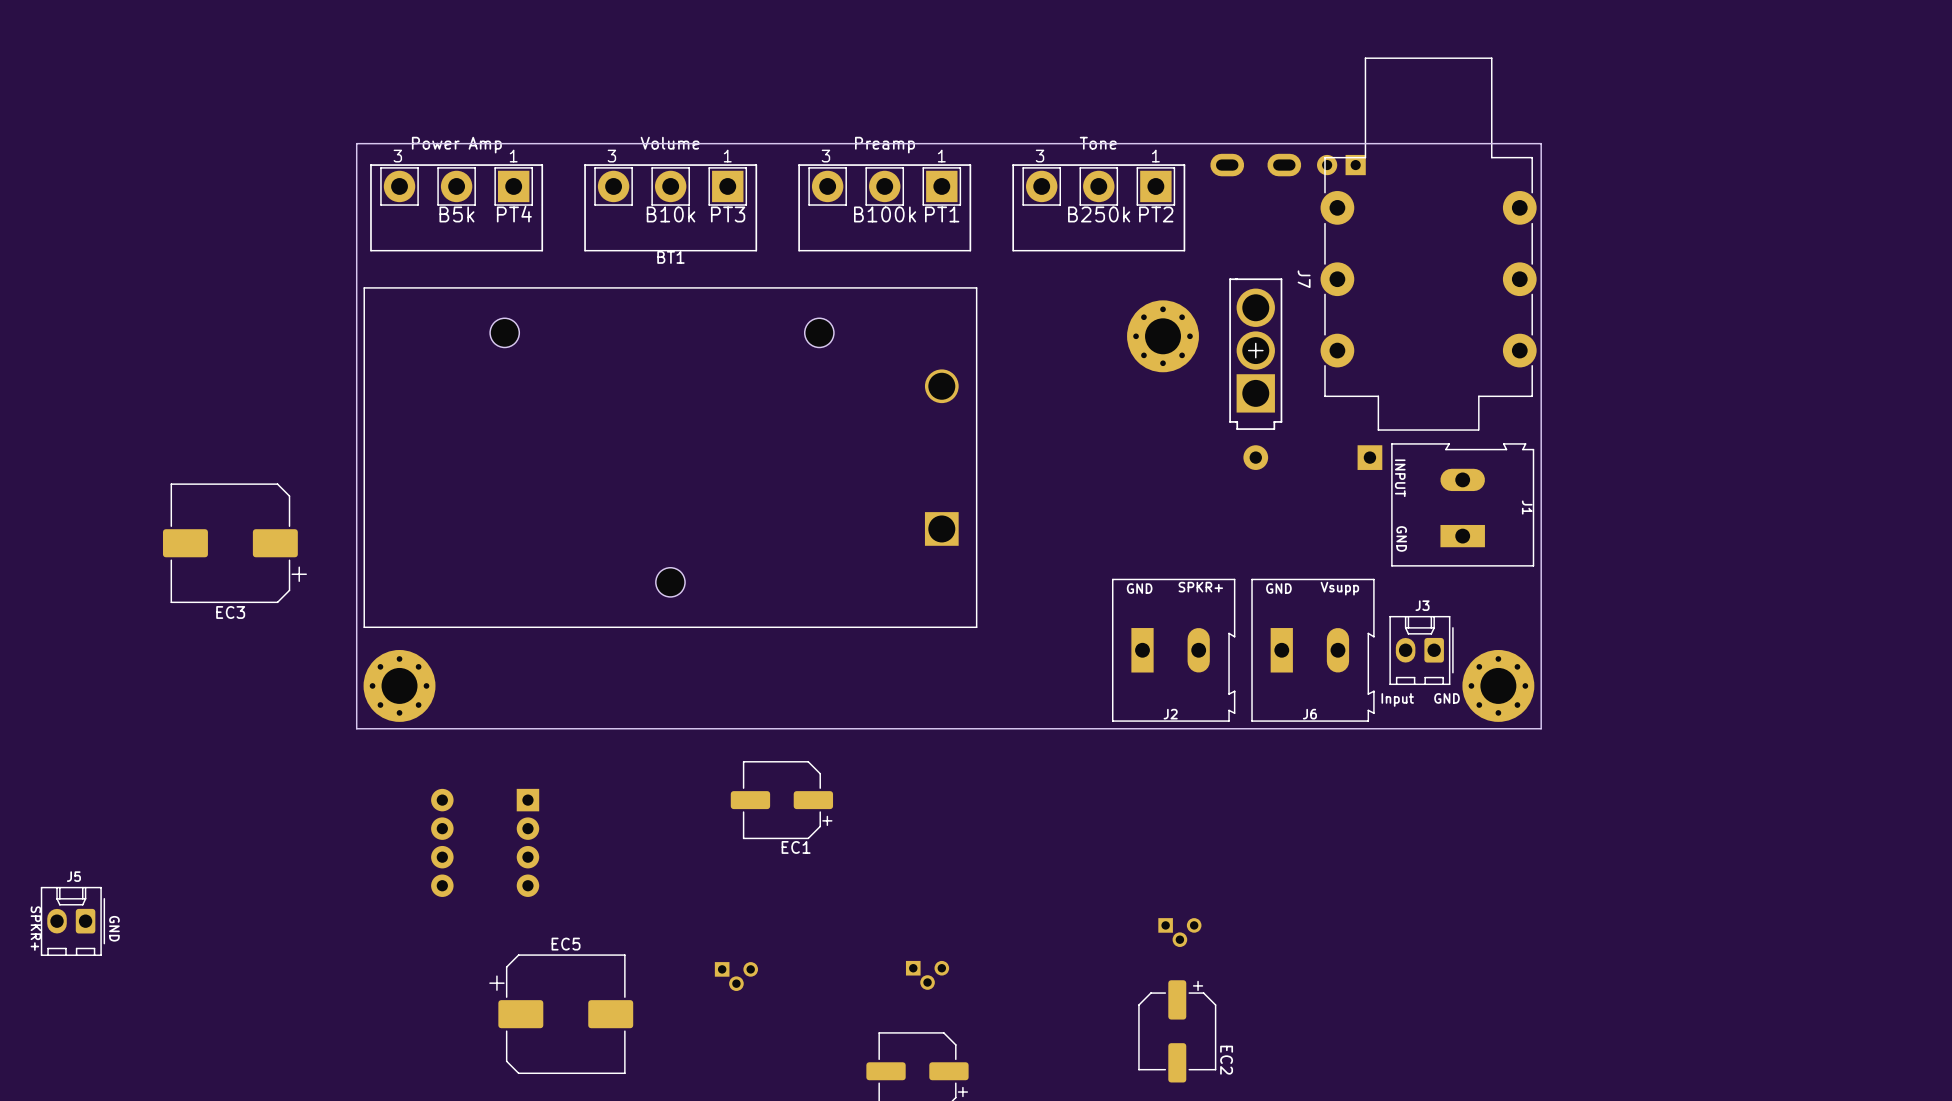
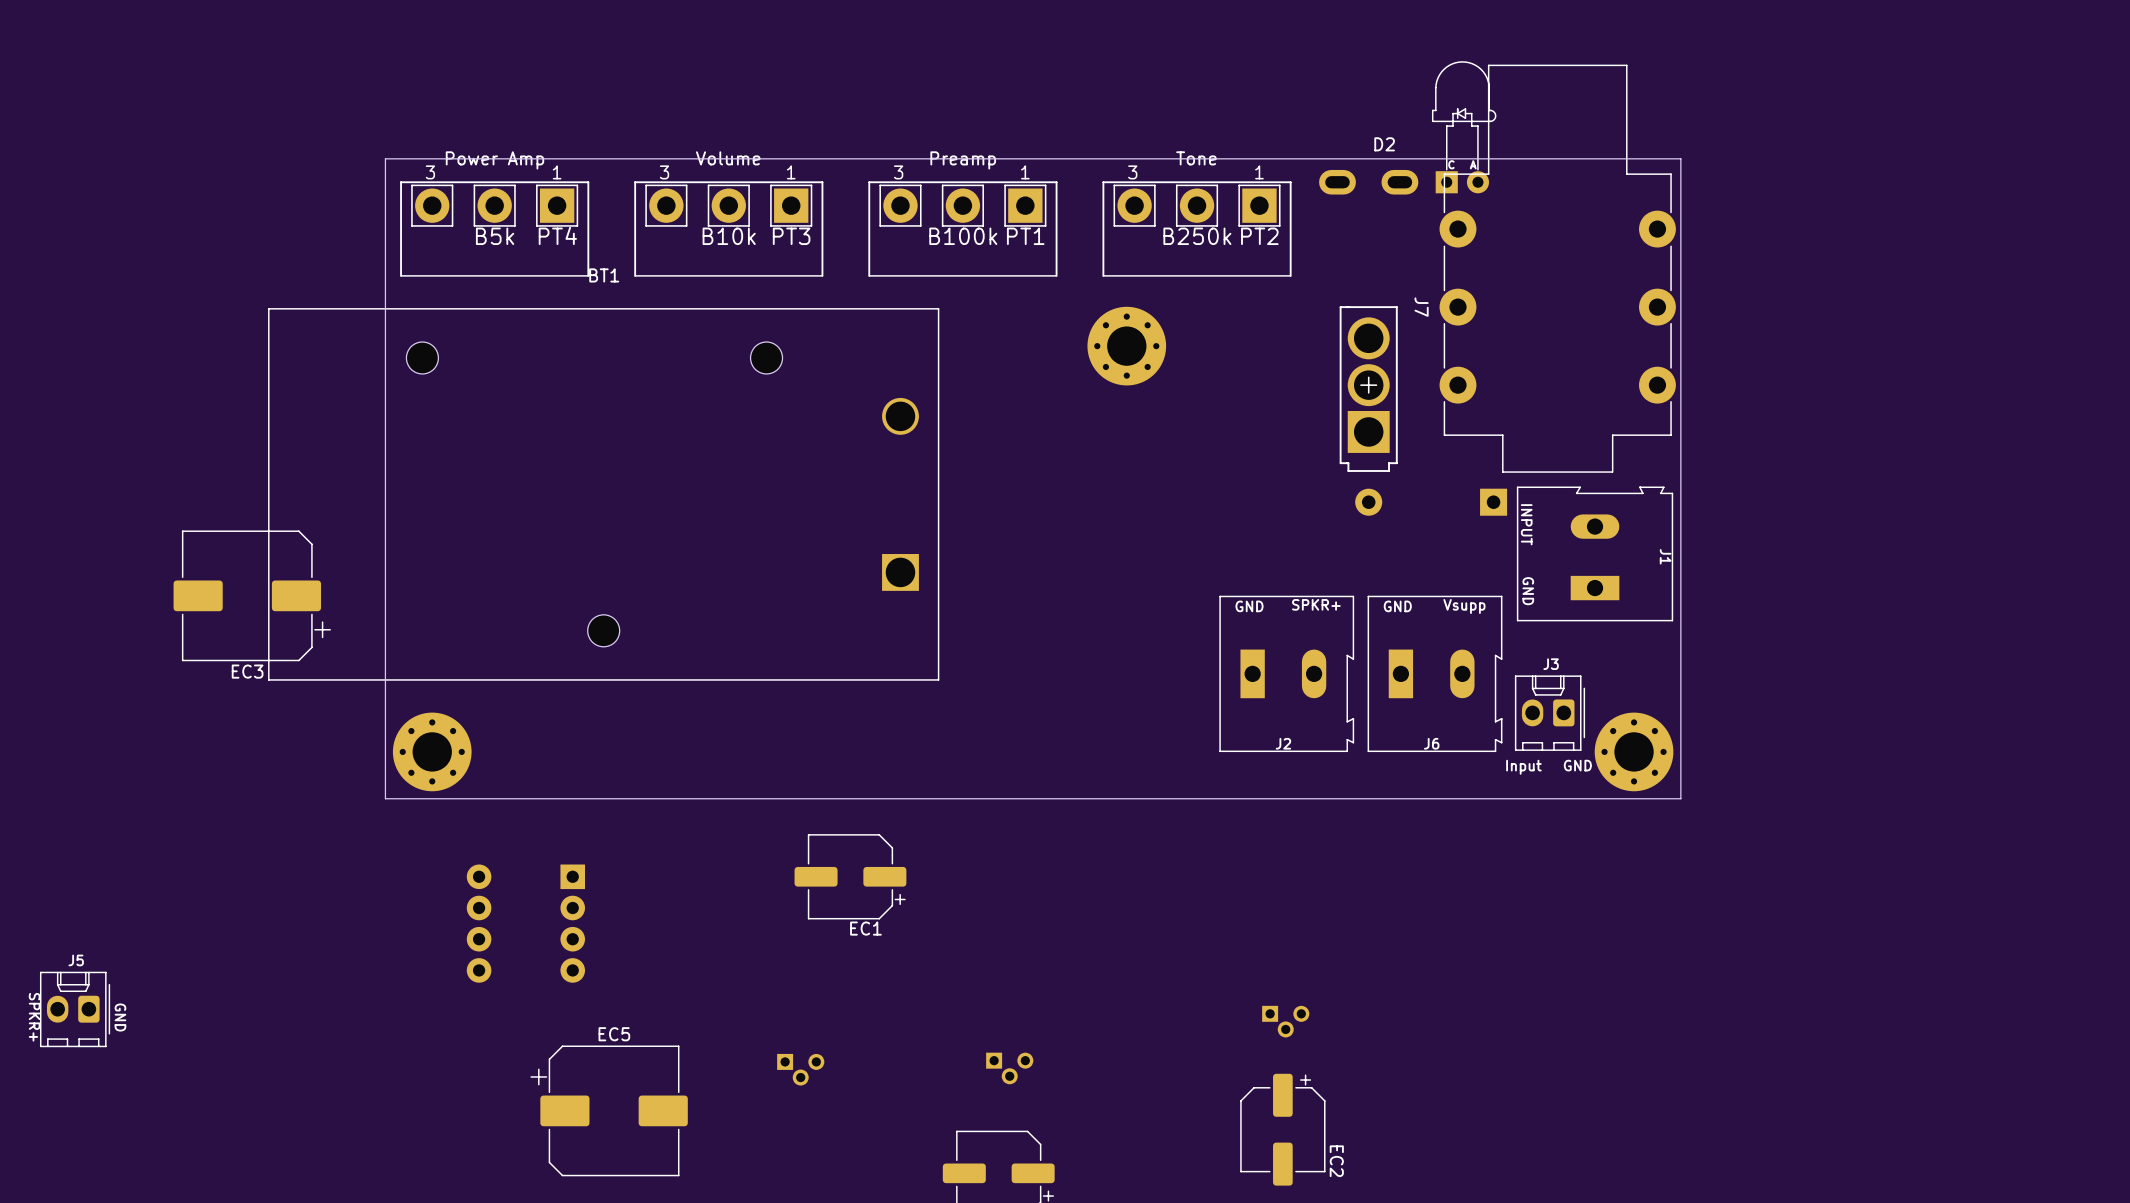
D2 side: top (1341, 165) -> bottom (1464, 127)
part position: (1163, 336) -> (1126, 346)
BT1 position: (670, 457) -> (603, 494)
J2 position: (1173, 650) -> (1286, 673)
J6 position: (1312, 650) -> (1435, 673)

